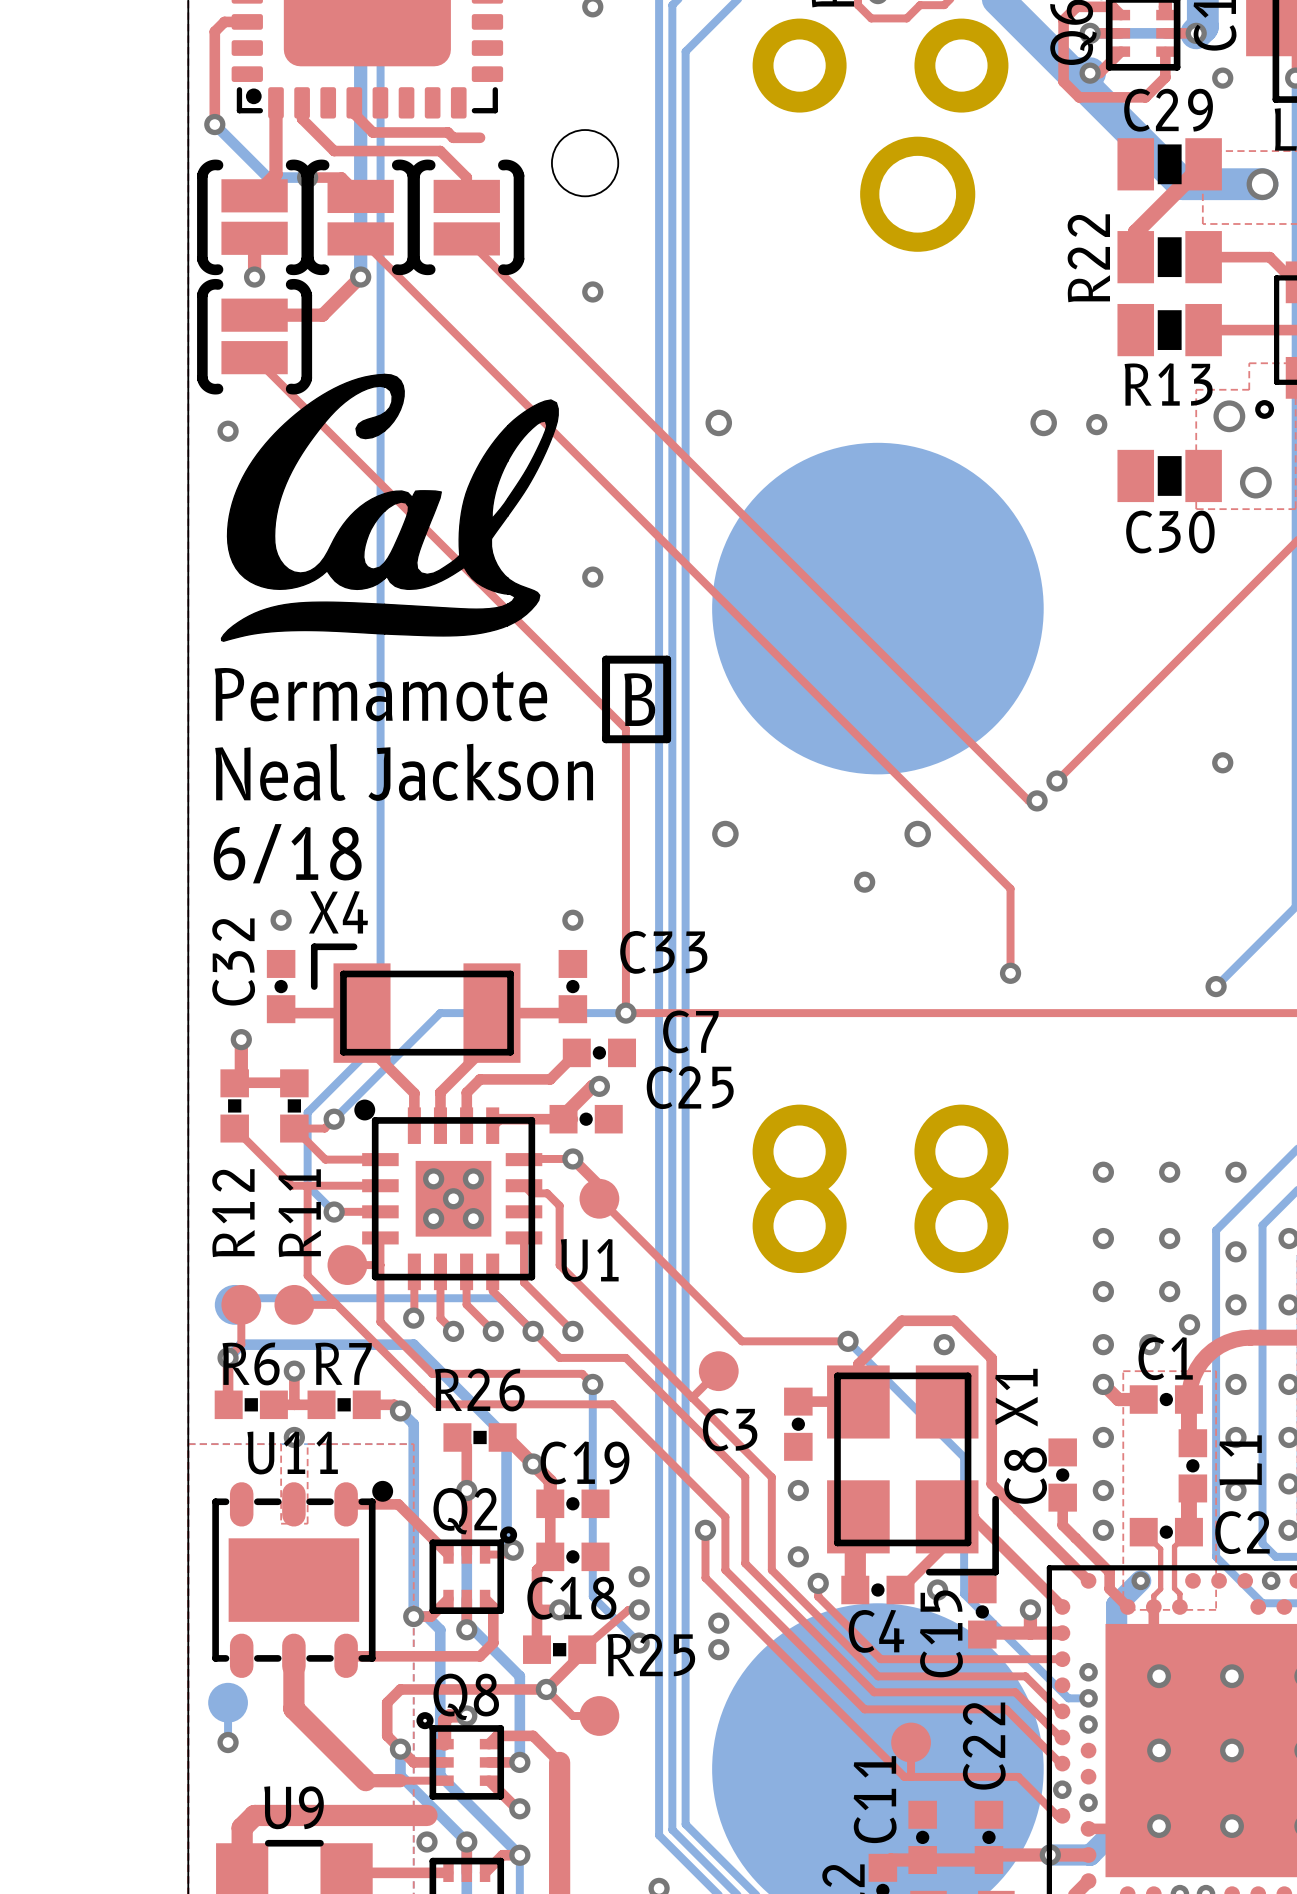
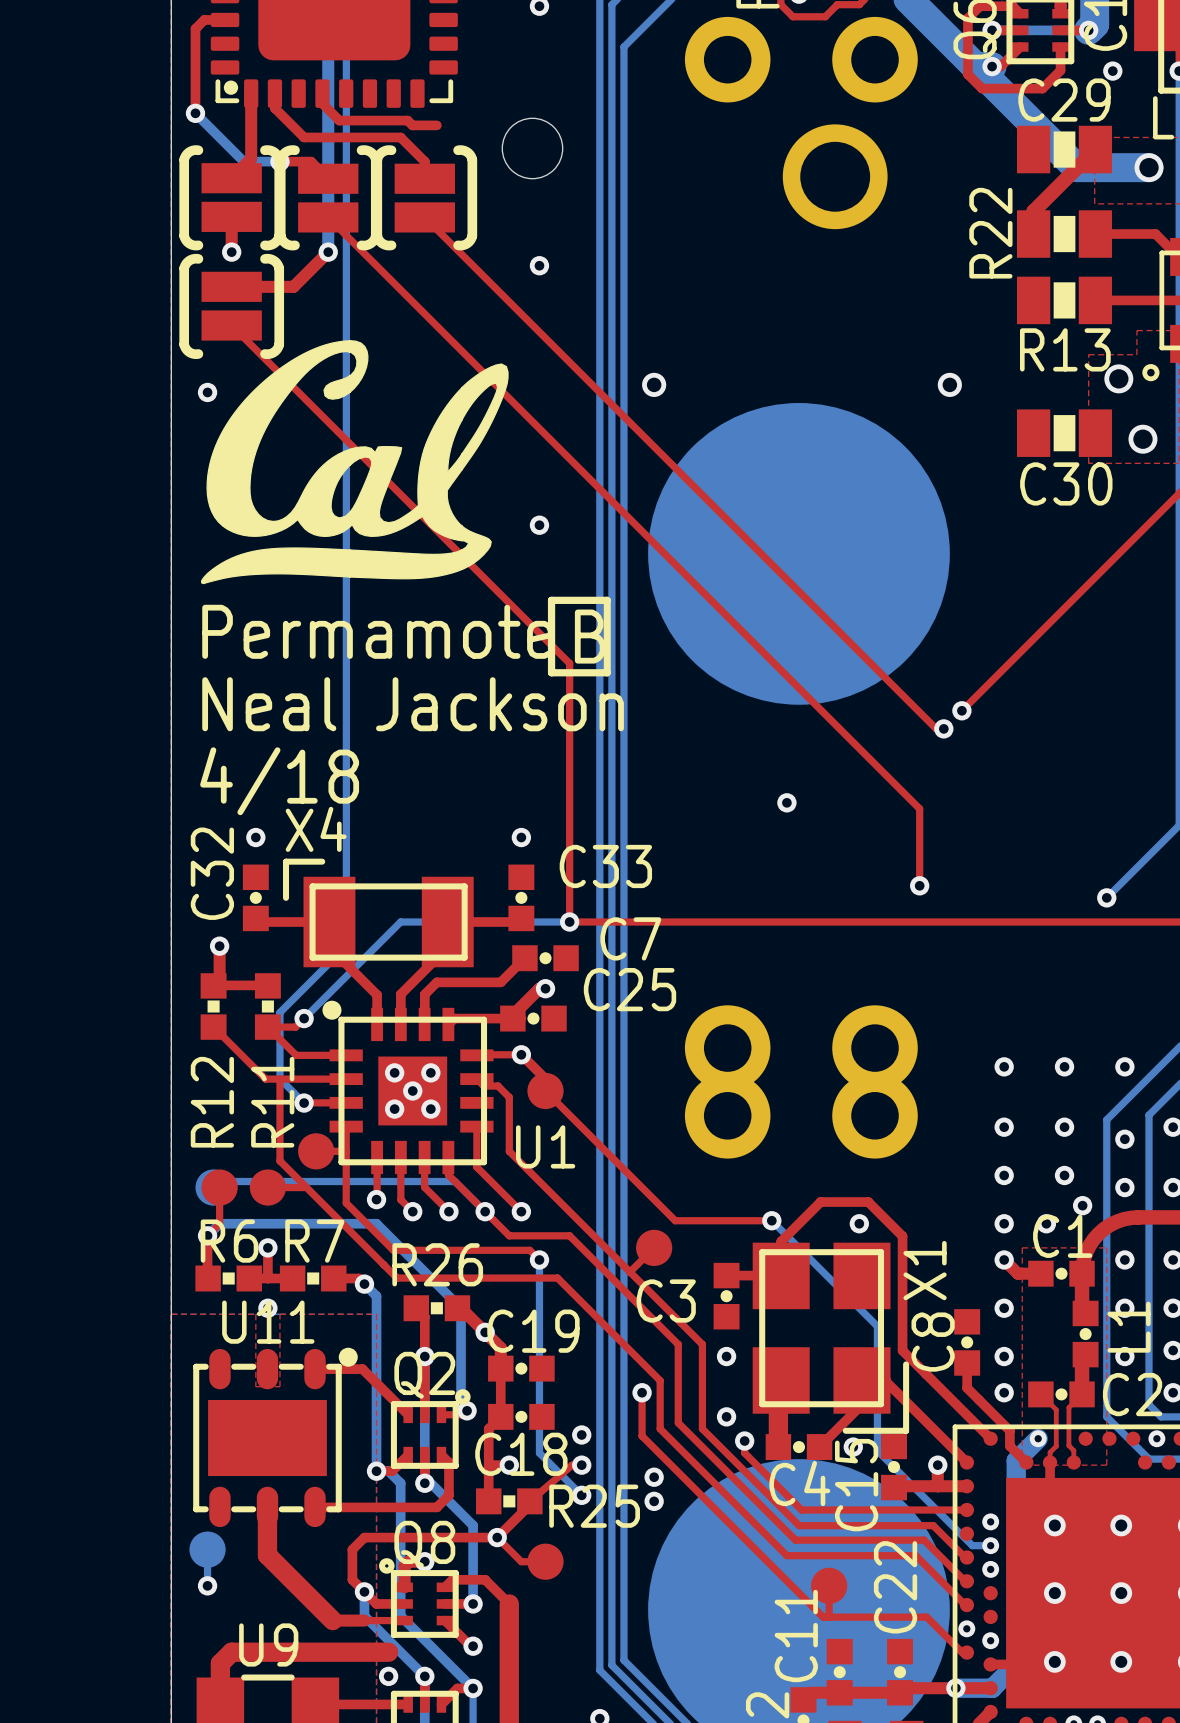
via: (1096, 424) -> none
via: (1222, 762) -> none
via: (725, 834) -> none
via: (917, 834) -> none
text: 6/18 (287, 853) -> 4/18 (279, 781)

